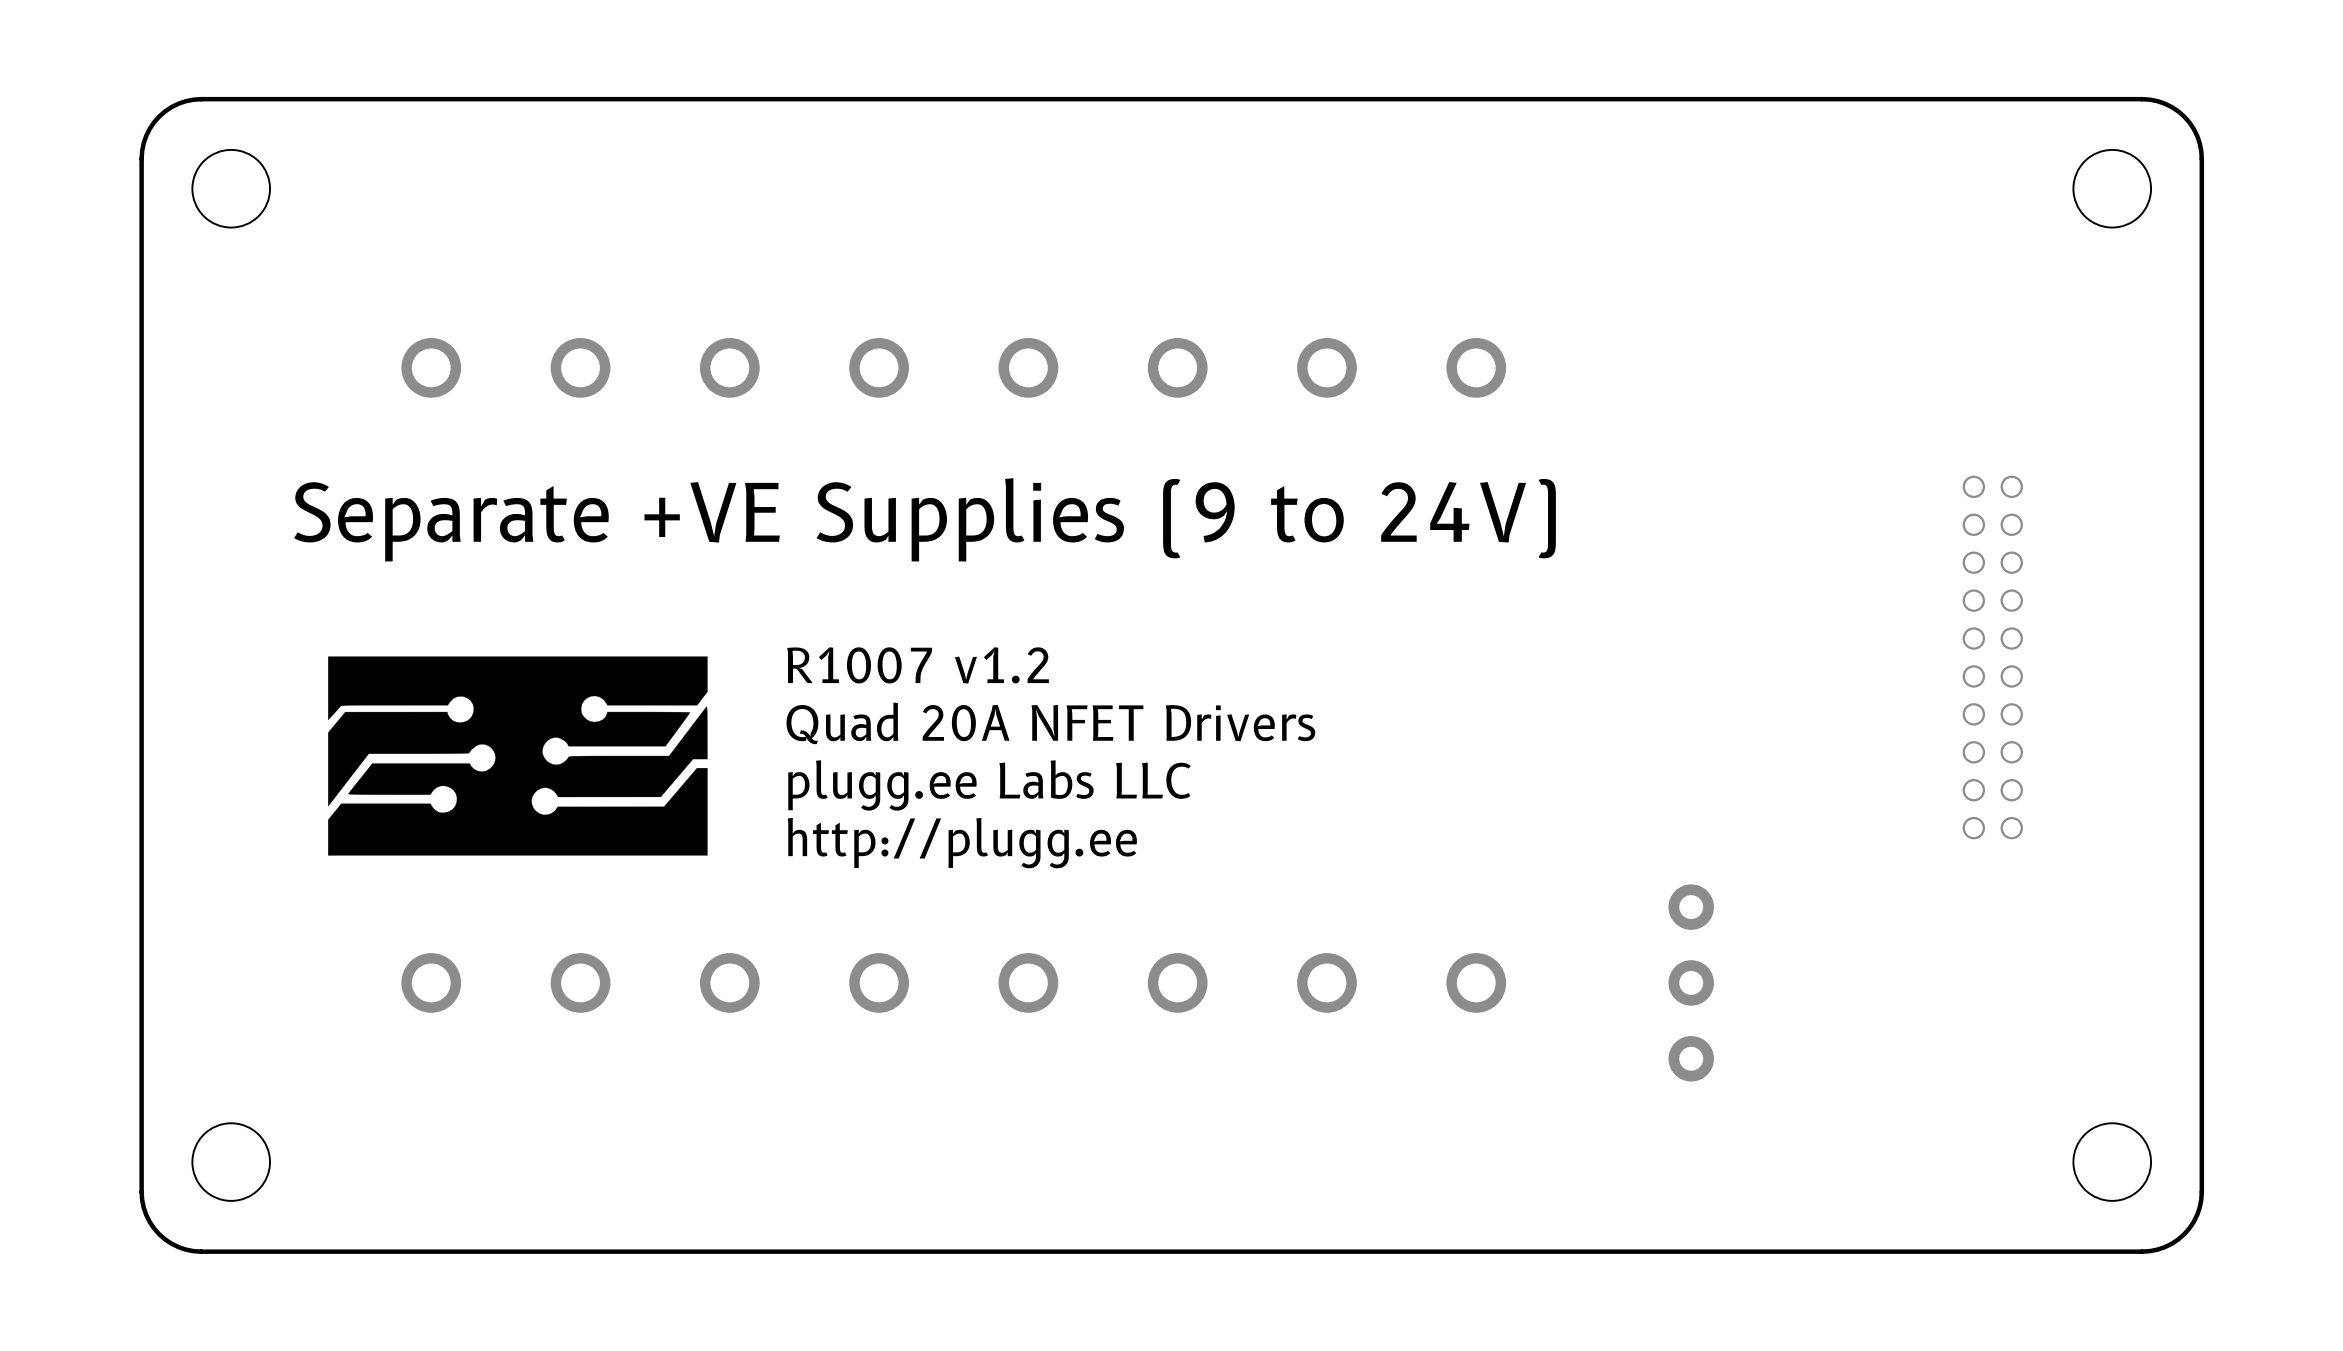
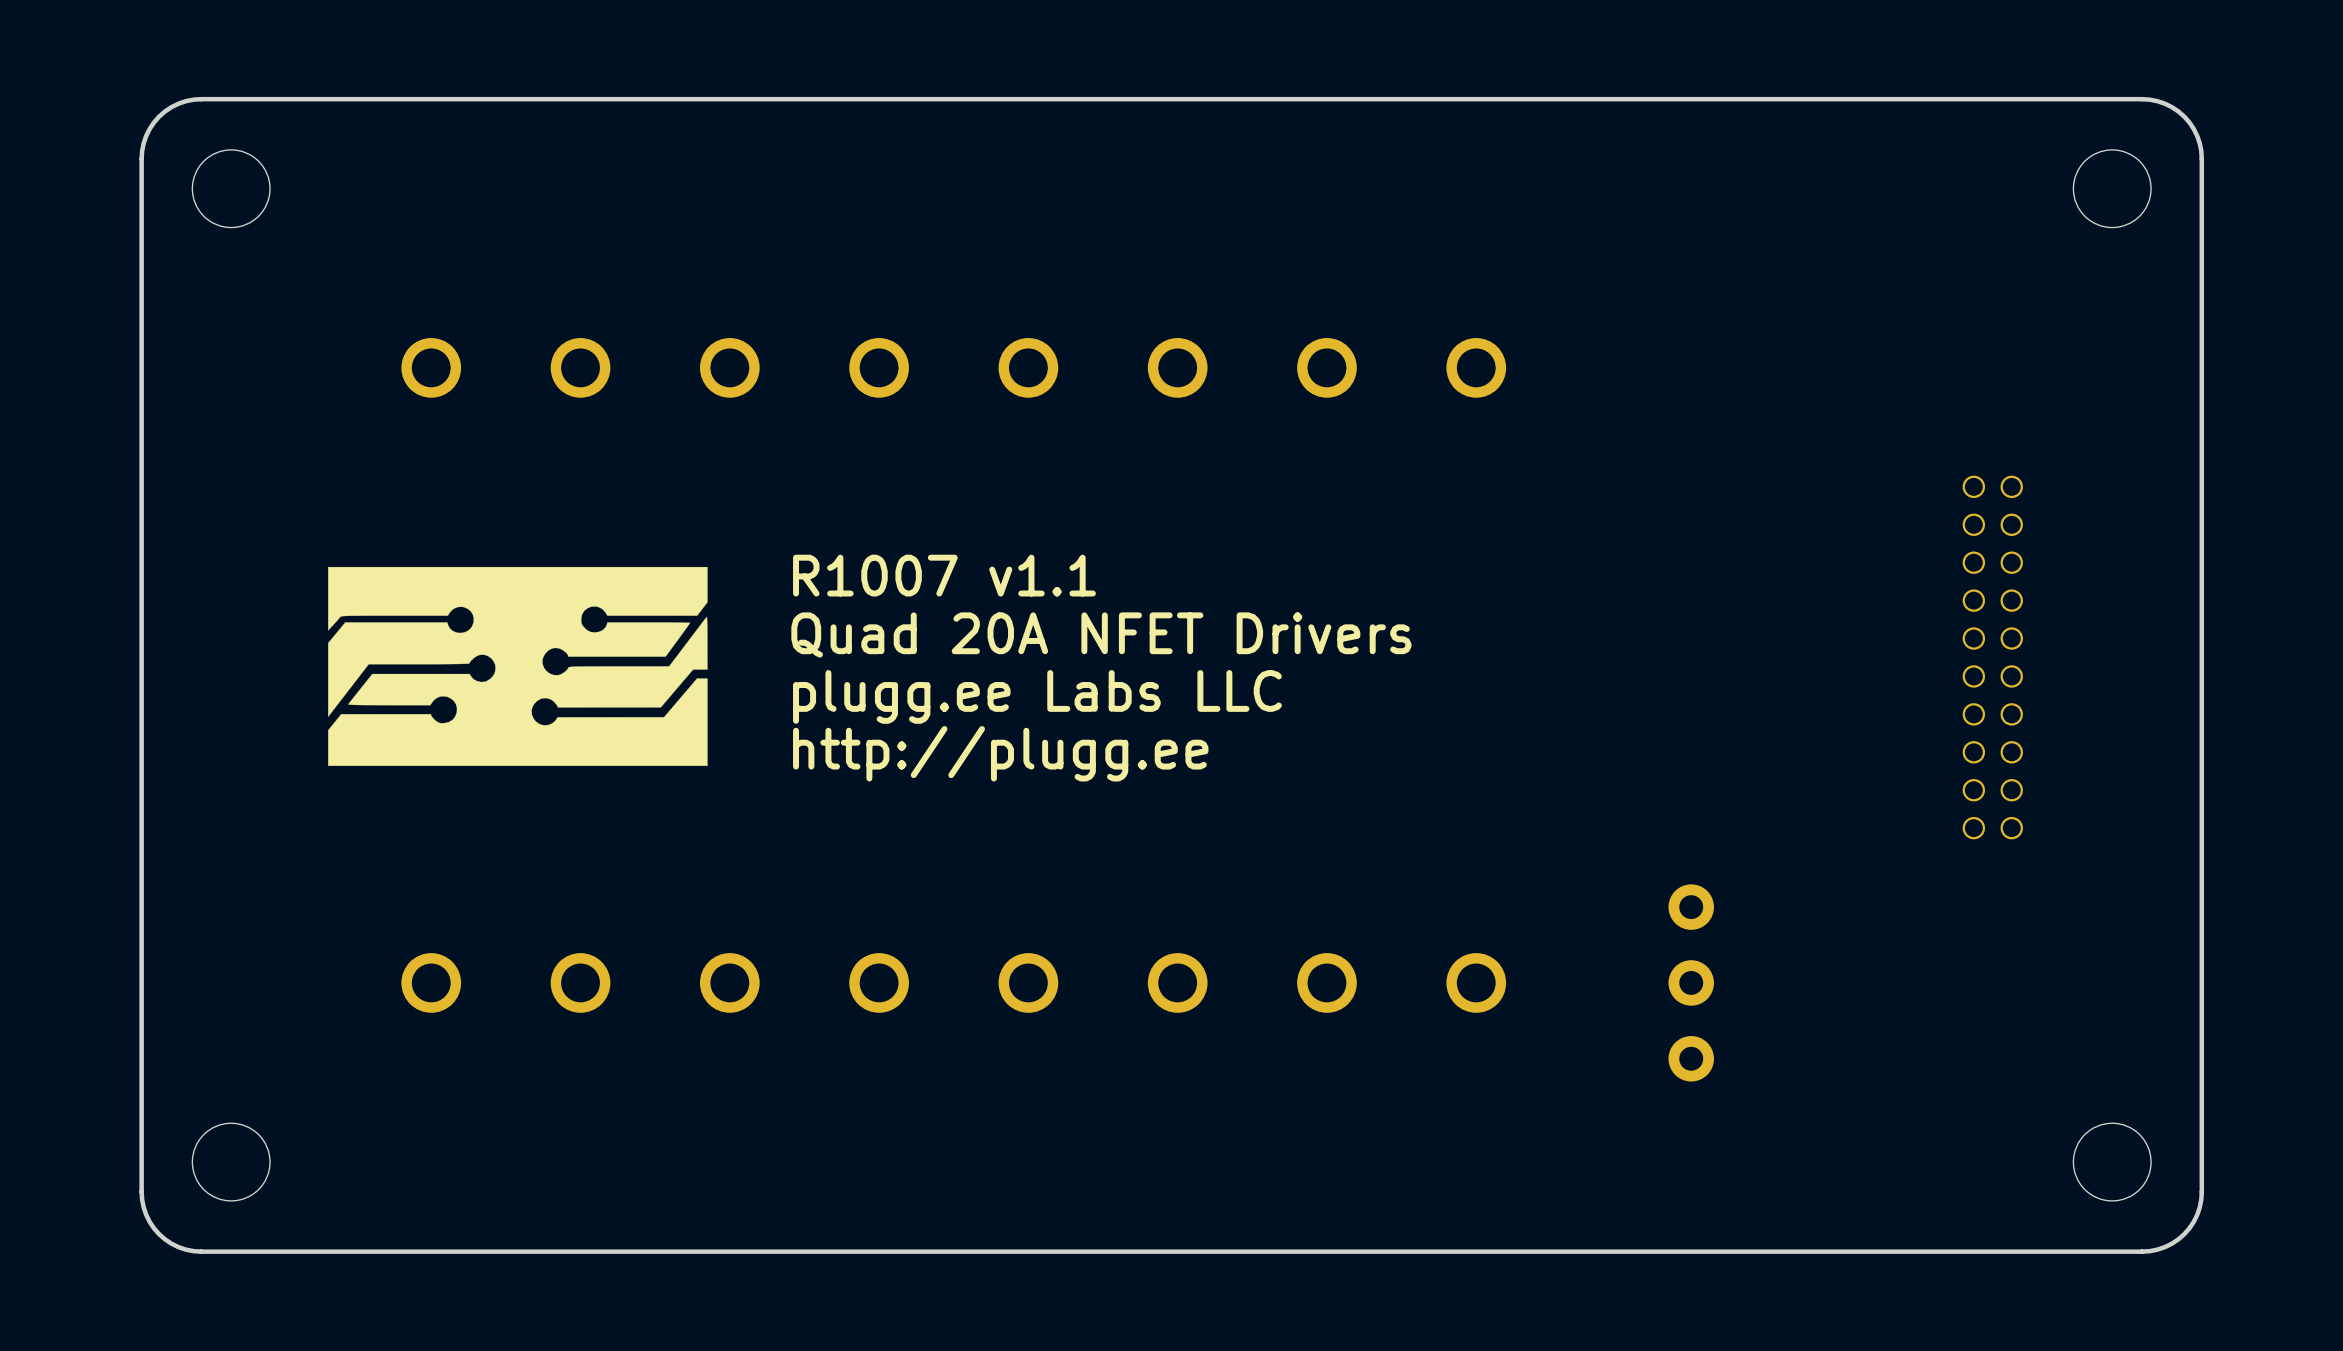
text: Separate +VE Supplies (9 to 24V) (925, 519) -> none
text: none -> R1007 v1.1 (944, 575)
text: R1007 v1.2 (918, 665) -> none
text position: Quad 20A NFET Drivers (1050, 723) -> Quad 20A NFET Drivers (1101, 634)
drawing position: (517, 756) -> (517, 666)
text position: plugg.ee Labs LLC (989, 785) -> plugg.ee Labs LLC (1037, 696)
text position: http://plugg.ee (962, 843) -> http://plugg.ee (1000, 753)

